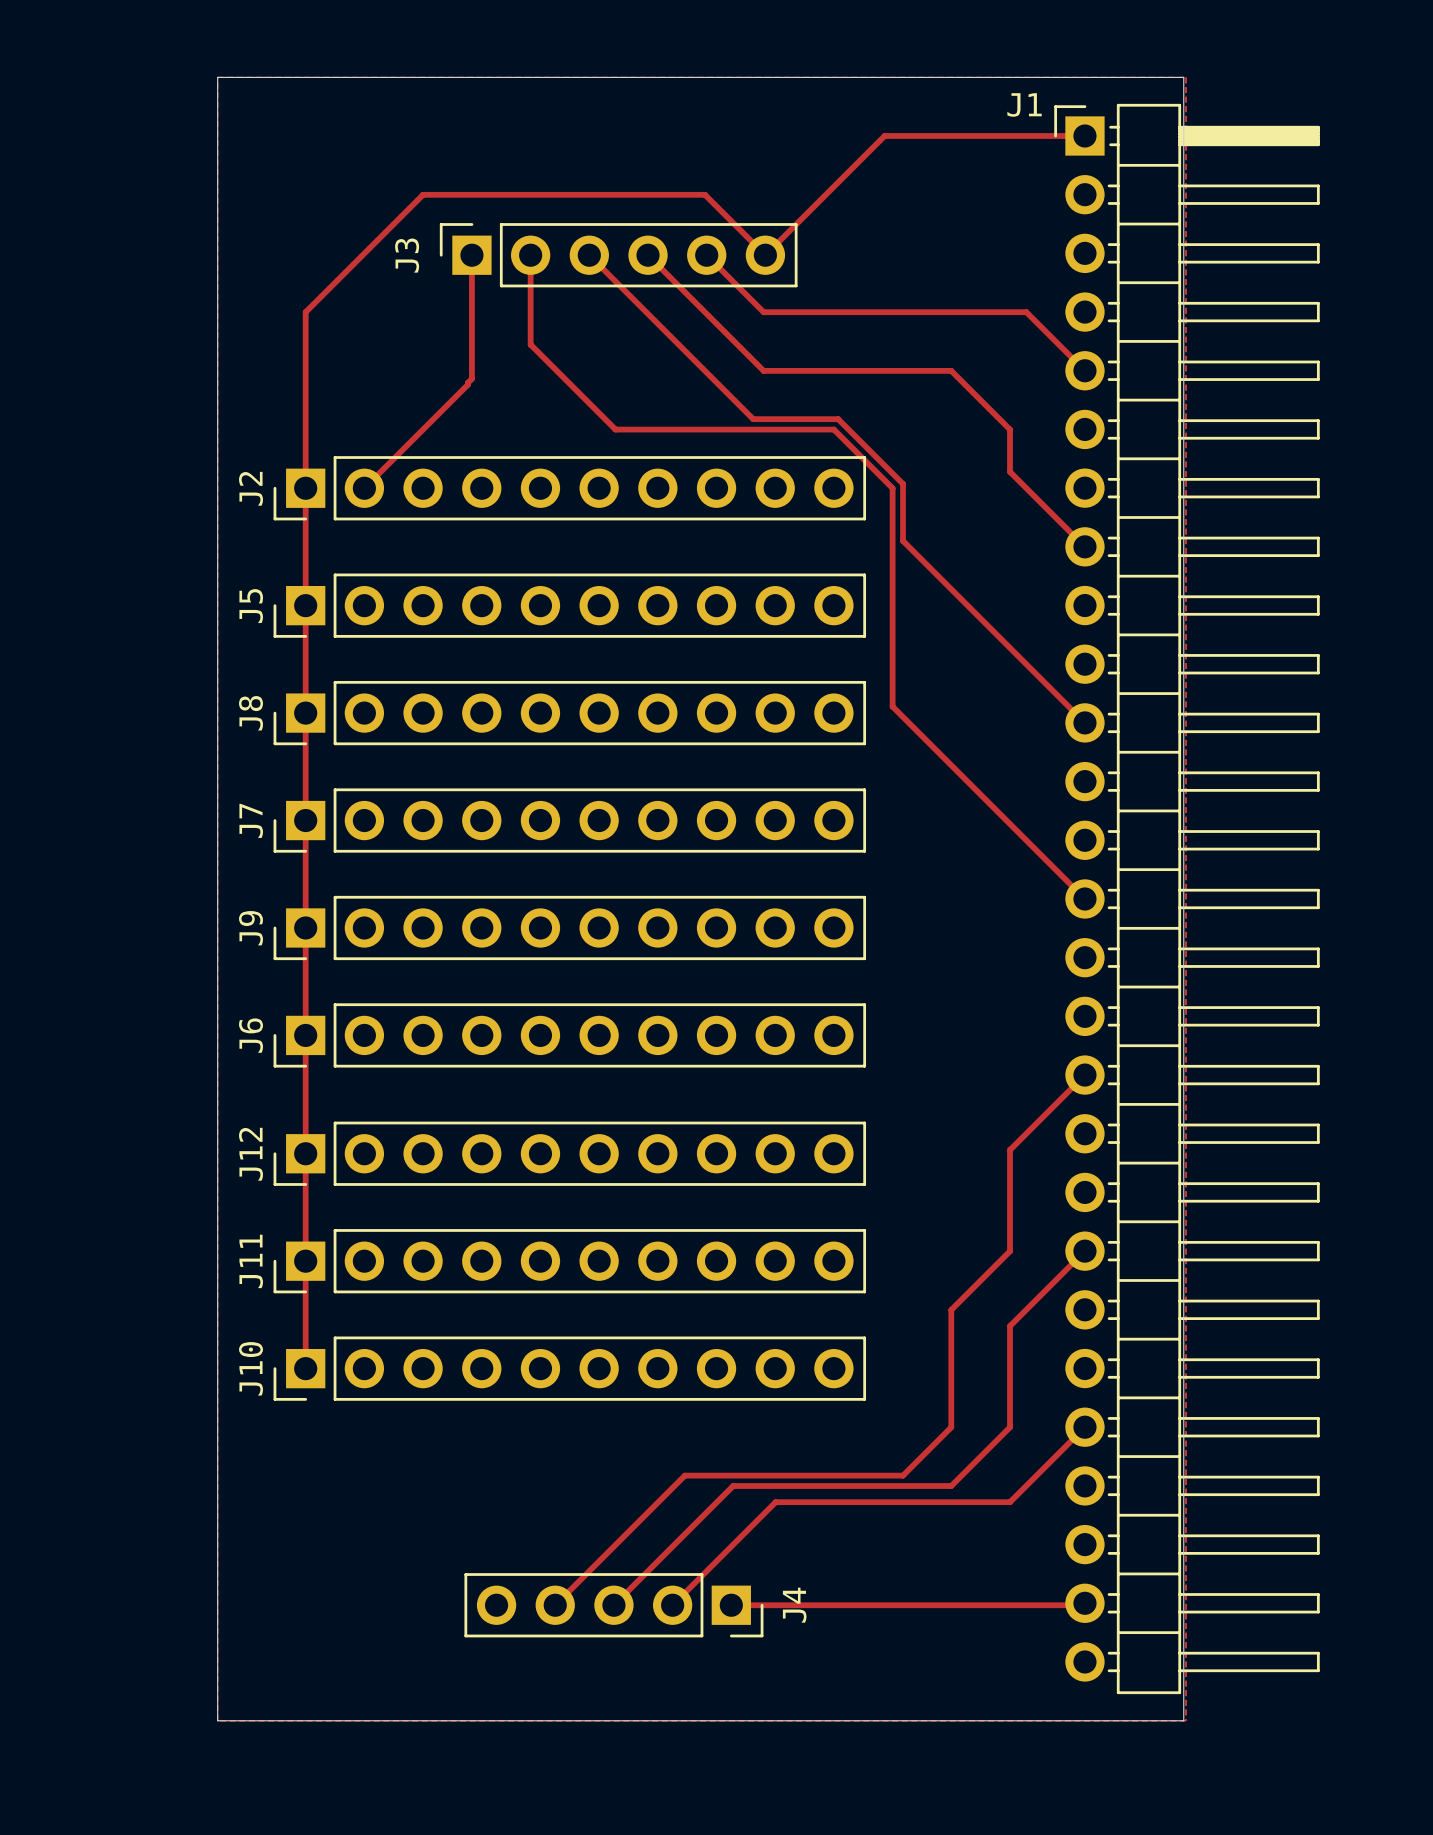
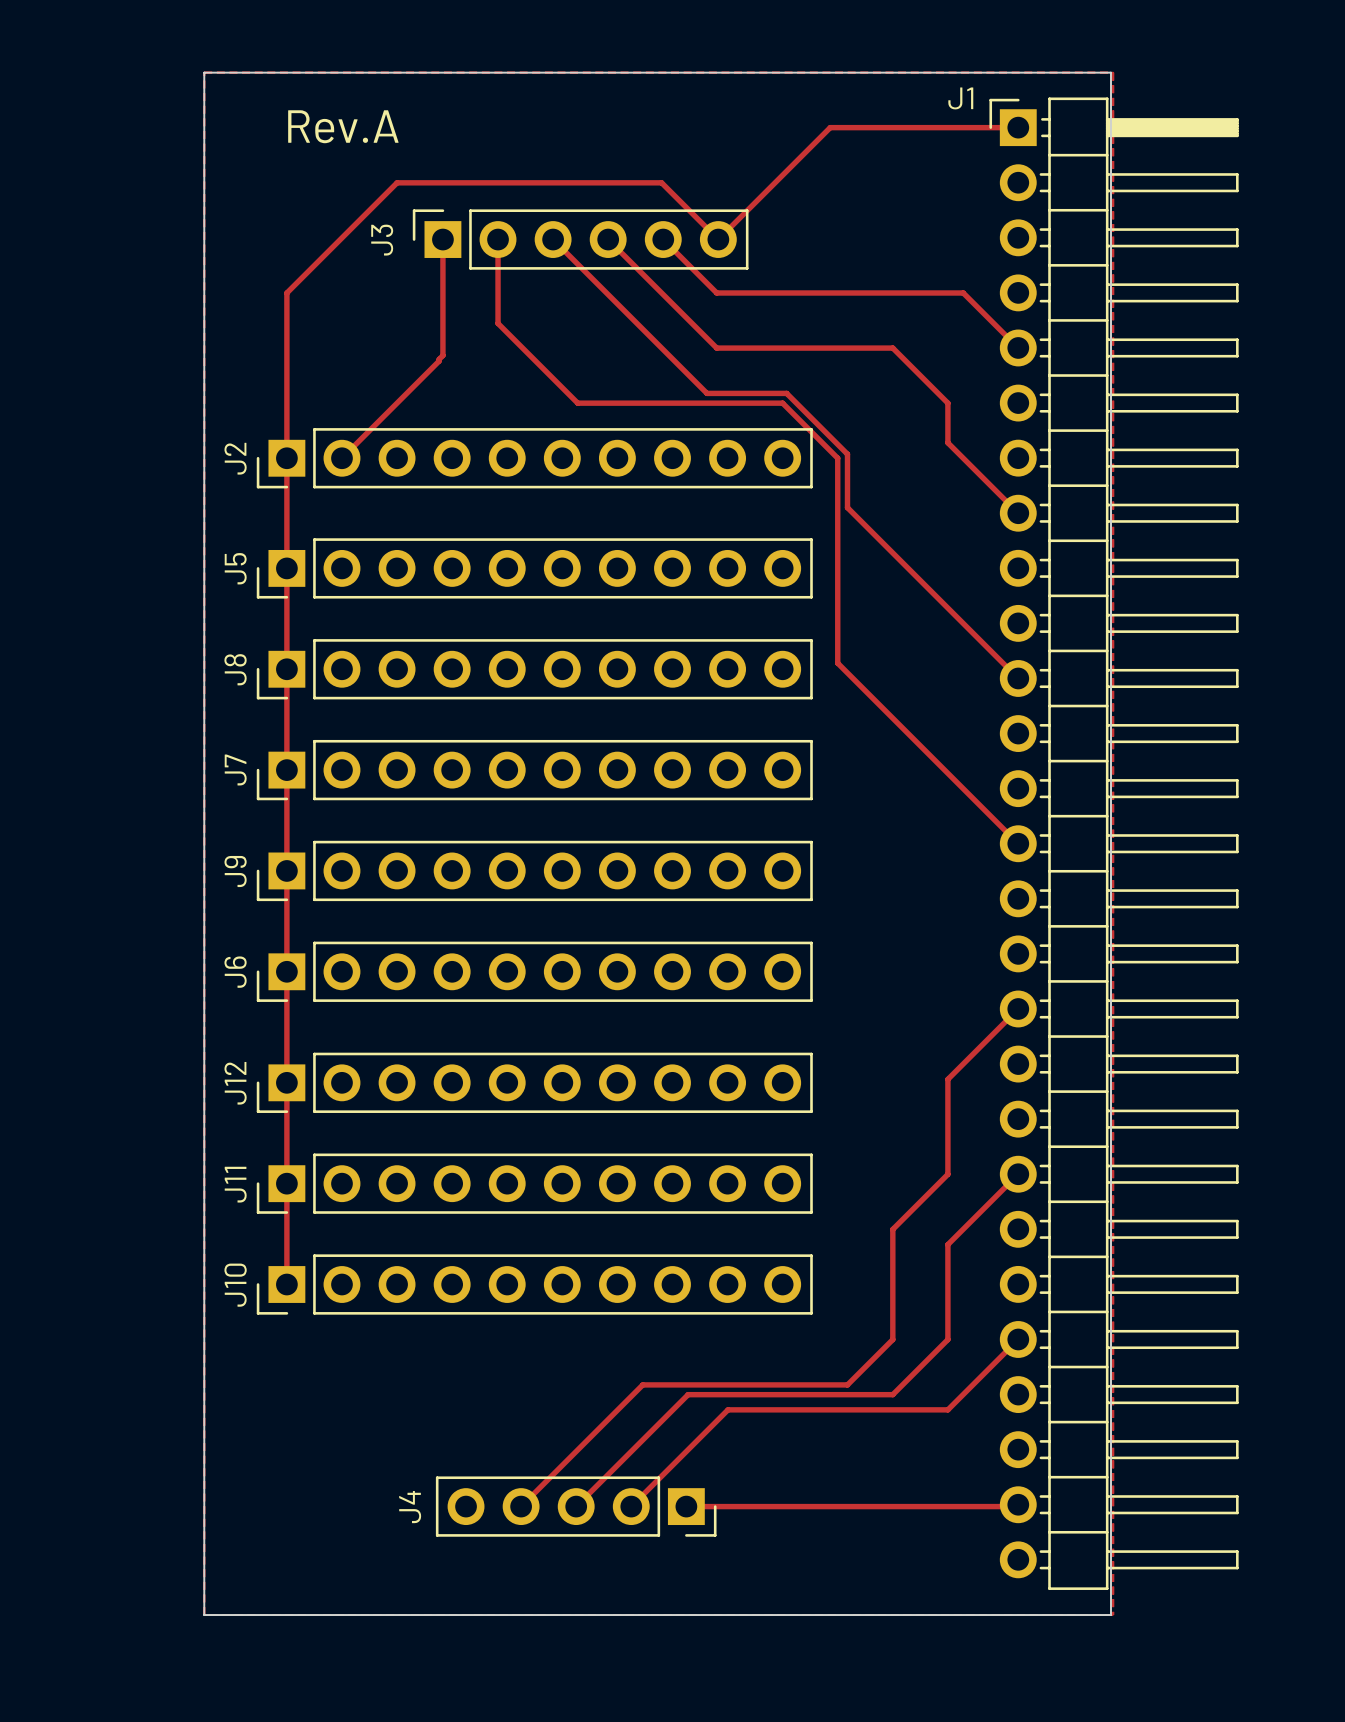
text: none -> Rev.A (343, 126)
J4 name position: J4 (794, 1605) -> J4 (410, 1507)

